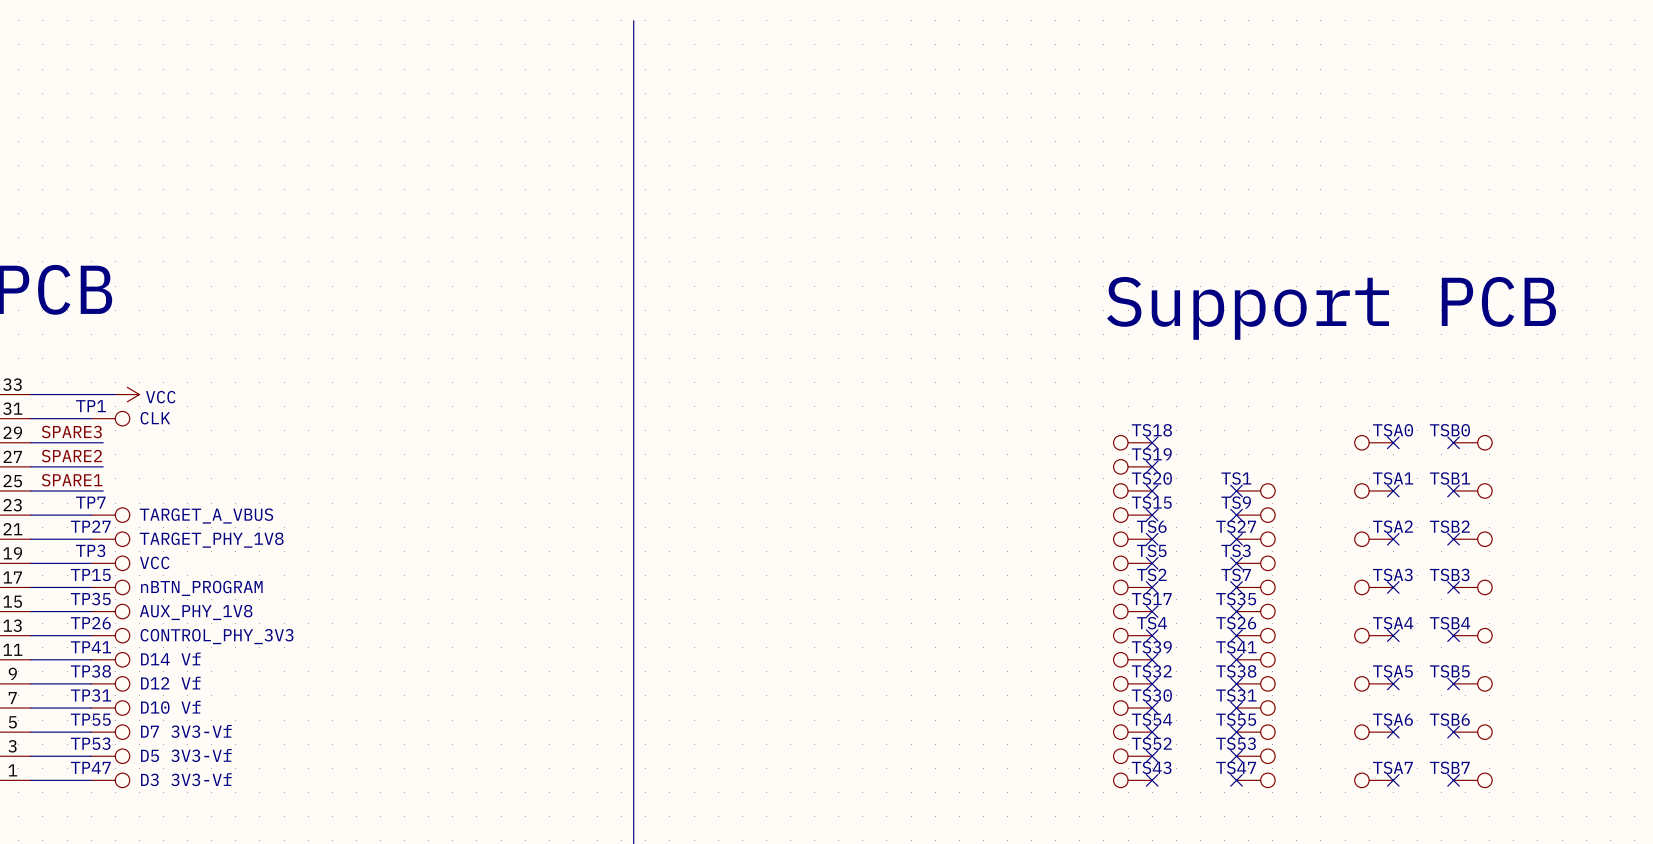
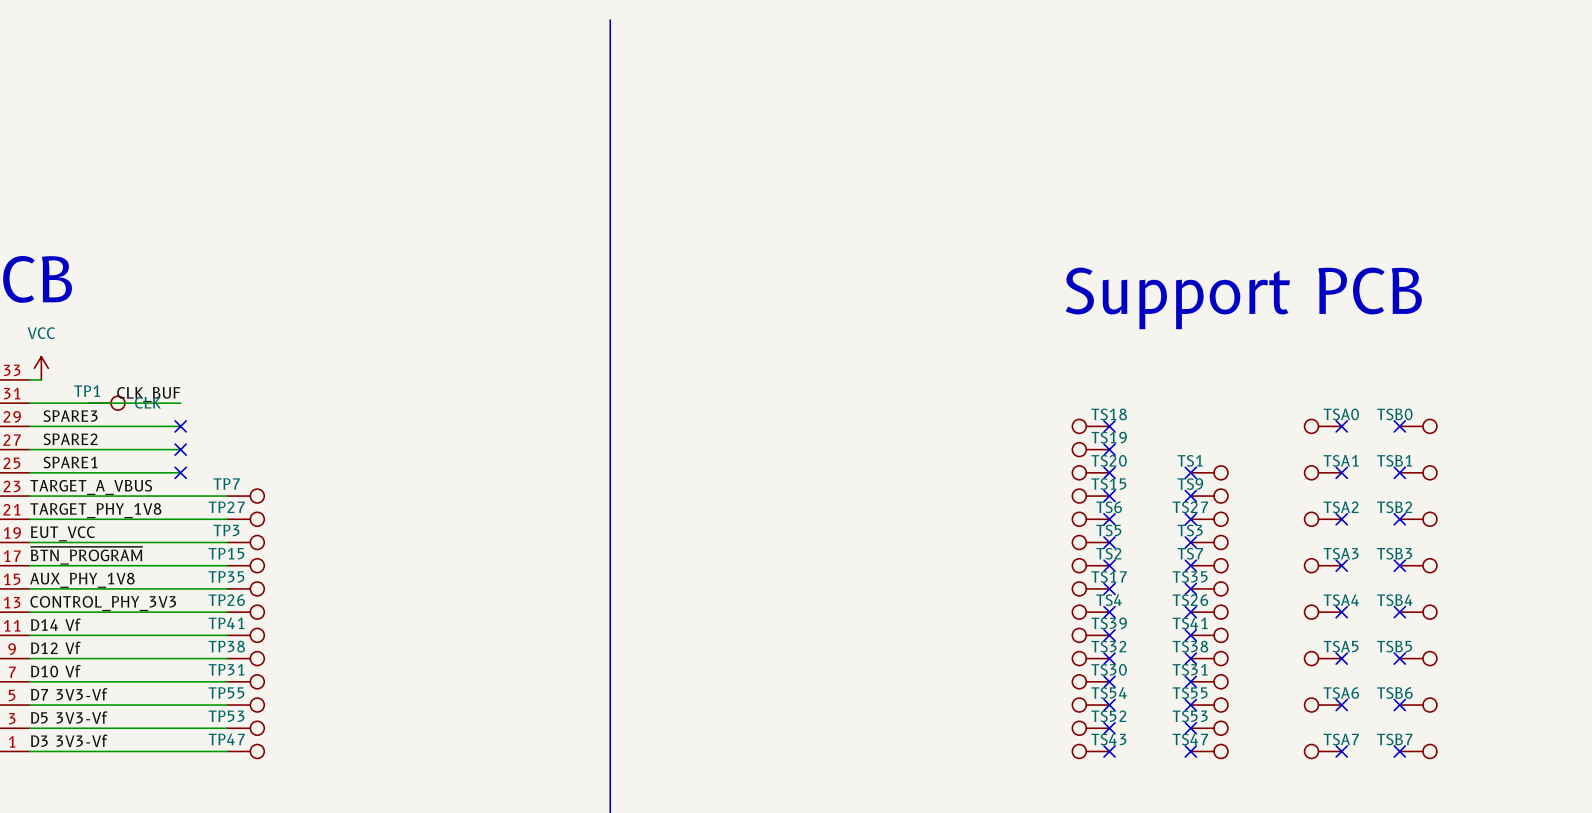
wire: (42, 394) (115, 394) -> none
power symbol rotation: 0° (127, 394) -> 90° counterclockwise (41, 368)
power symbol position: VCC (127, 394) -> VCC (41, 368)
label: none -> CLK_BUF (148, 394)
wire: none -> (87, 403) (180, 403)
wire: none -> (99, 426) (180, 426)
no-connect mark: none -> (180, 426)
wire: none -> (99, 449) (180, 449)
no-connect mark: none -> (180, 449)
wire: none -> (99, 472) (180, 472)
no-connect mark: none -> (180, 472)
label: none -> TARGET_A_VBUS (91, 487)
wire: none -> (87, 496) (227, 496)
TP7 position: (110, 515) -> (245, 496)
TP7 value: TARGET_A_VBUS (206, 516) -> none
label: none -> TARGET_PHY_1V8 (95, 510)
wire: none -> (87, 519) (227, 519)
TP27 position: (110, 539) -> (245, 519)
TP27 value: TARGET_PHY_1V8 (211, 540) -> none
label: none -> EUT_VCC (62, 533)
TP3 value: VCC (154, 562) -> none
wire: none -> (87, 542) (227, 542)
TP3 position: (110, 563) -> (245, 542)
label: none -> ~{BTN_PROGRAM} (86, 555)
wire: none -> (87, 565) (227, 565)
TP15 position: (110, 587) -> (245, 565)
TP15 value: nBTN_PROGRAM (201, 588) -> none
label: none -> AUX_PHY_1V8 (82, 580)
wire: none -> (87, 588) (227, 588)
TP35 position: (110, 611) -> (245, 588)
TP35 value: AUX_PHY_1V8 (196, 612) -> none
label: none -> CONTROL_PHY_3V3 (103, 603)
wire: none -> (87, 612) (227, 612)
TP26 position: (110, 635) -> (245, 612)
TP26 value: CONTROL_PHY_3V3 (217, 636) -> none
label: none -> D14 Vf (55, 624)
TP41 value: D14 Vf (170, 658) -> none
wire: none -> (87, 635) (227, 635)
TP41 position: (110, 659) -> (245, 635)
label: none -> D12 Vf (55, 647)
wire: none -> (87, 658) (227, 658)
TP38 position: (110, 683) -> (245, 658)
TP38 value: D12 Vf (170, 683) -> none
label: none -> D10 Vf (55, 671)
TP31 value: D10 Vf (170, 707) -> none
wire: none -> (87, 681) (227, 681)
TP31 position: (110, 708) -> (245, 681)
label: none -> D7 3V3-Vf (69, 694)
TP55 value: D7 3V3-Vf (186, 731) -> none
wire: none -> (87, 705) (227, 705)
TP55 position: (110, 732) -> (245, 705)
label: none -> D5 3V3-Vf (69, 717)
TP53 value: D5 3V3-Vf (186, 755) -> none
wire: none -> (87, 728) (227, 728)
TP53 position: (110, 756) -> (245, 728)
label: none -> D3 3V3-Vf (69, 740)
TP47 value: D3 3V3-Vf (186, 779) -> none
wire: none -> (87, 751) (227, 751)
TP47 position: (110, 780) -> (245, 751)

